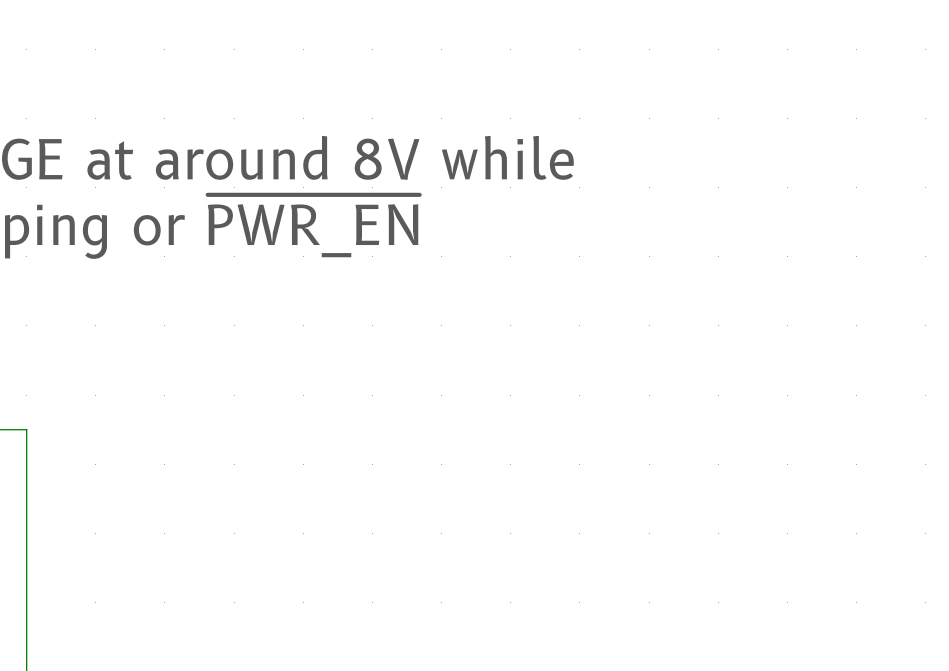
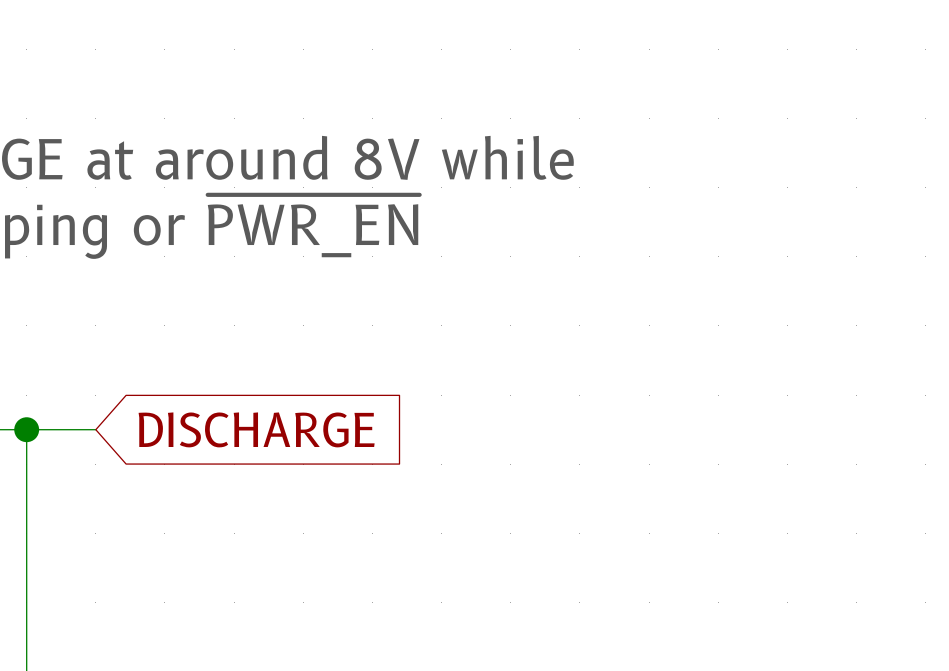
wire: none -> (26, 429) (95, 429)
junction: none -> (26, 429)
global label: none -> DISCHARGE (256, 429)

